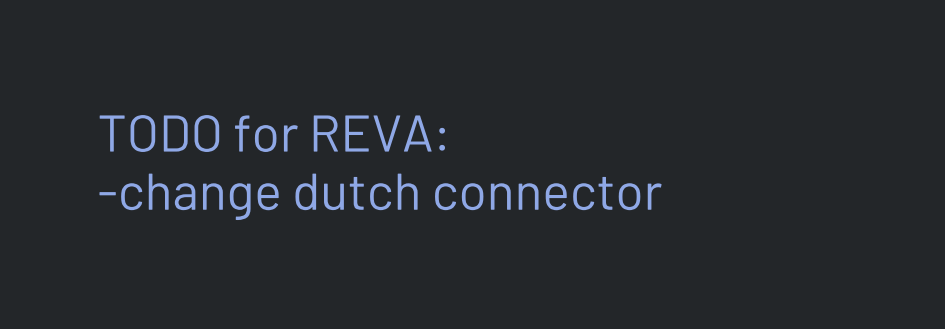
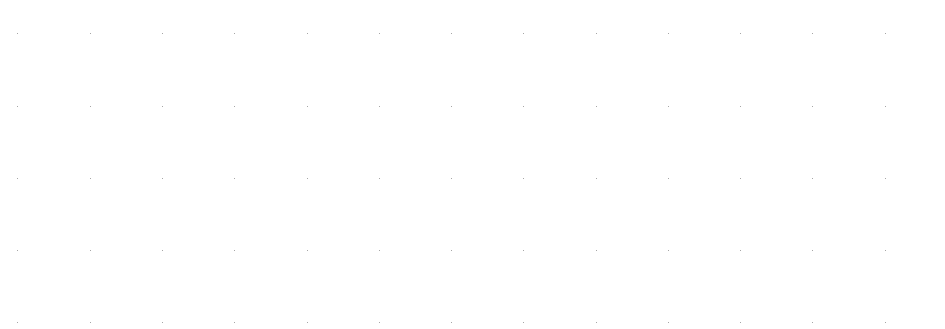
text: TODO for REVA: (272, 133) -> none
text: -change dutch connector (380, 196) -> none

